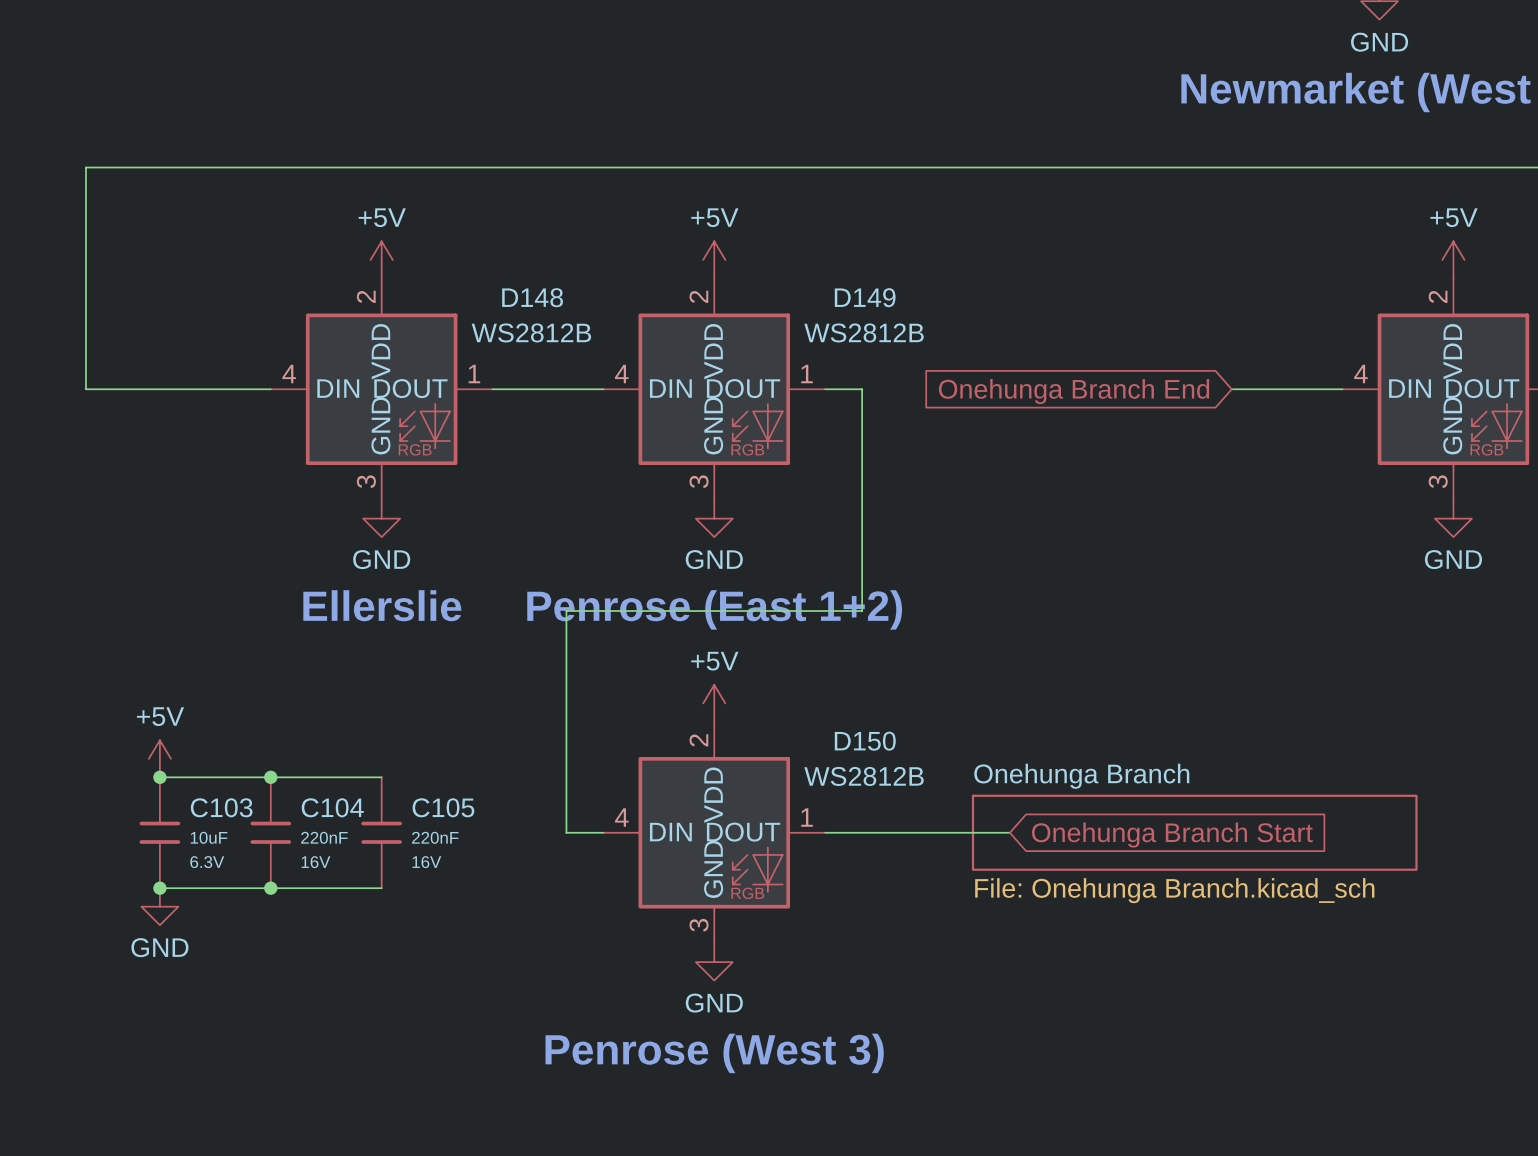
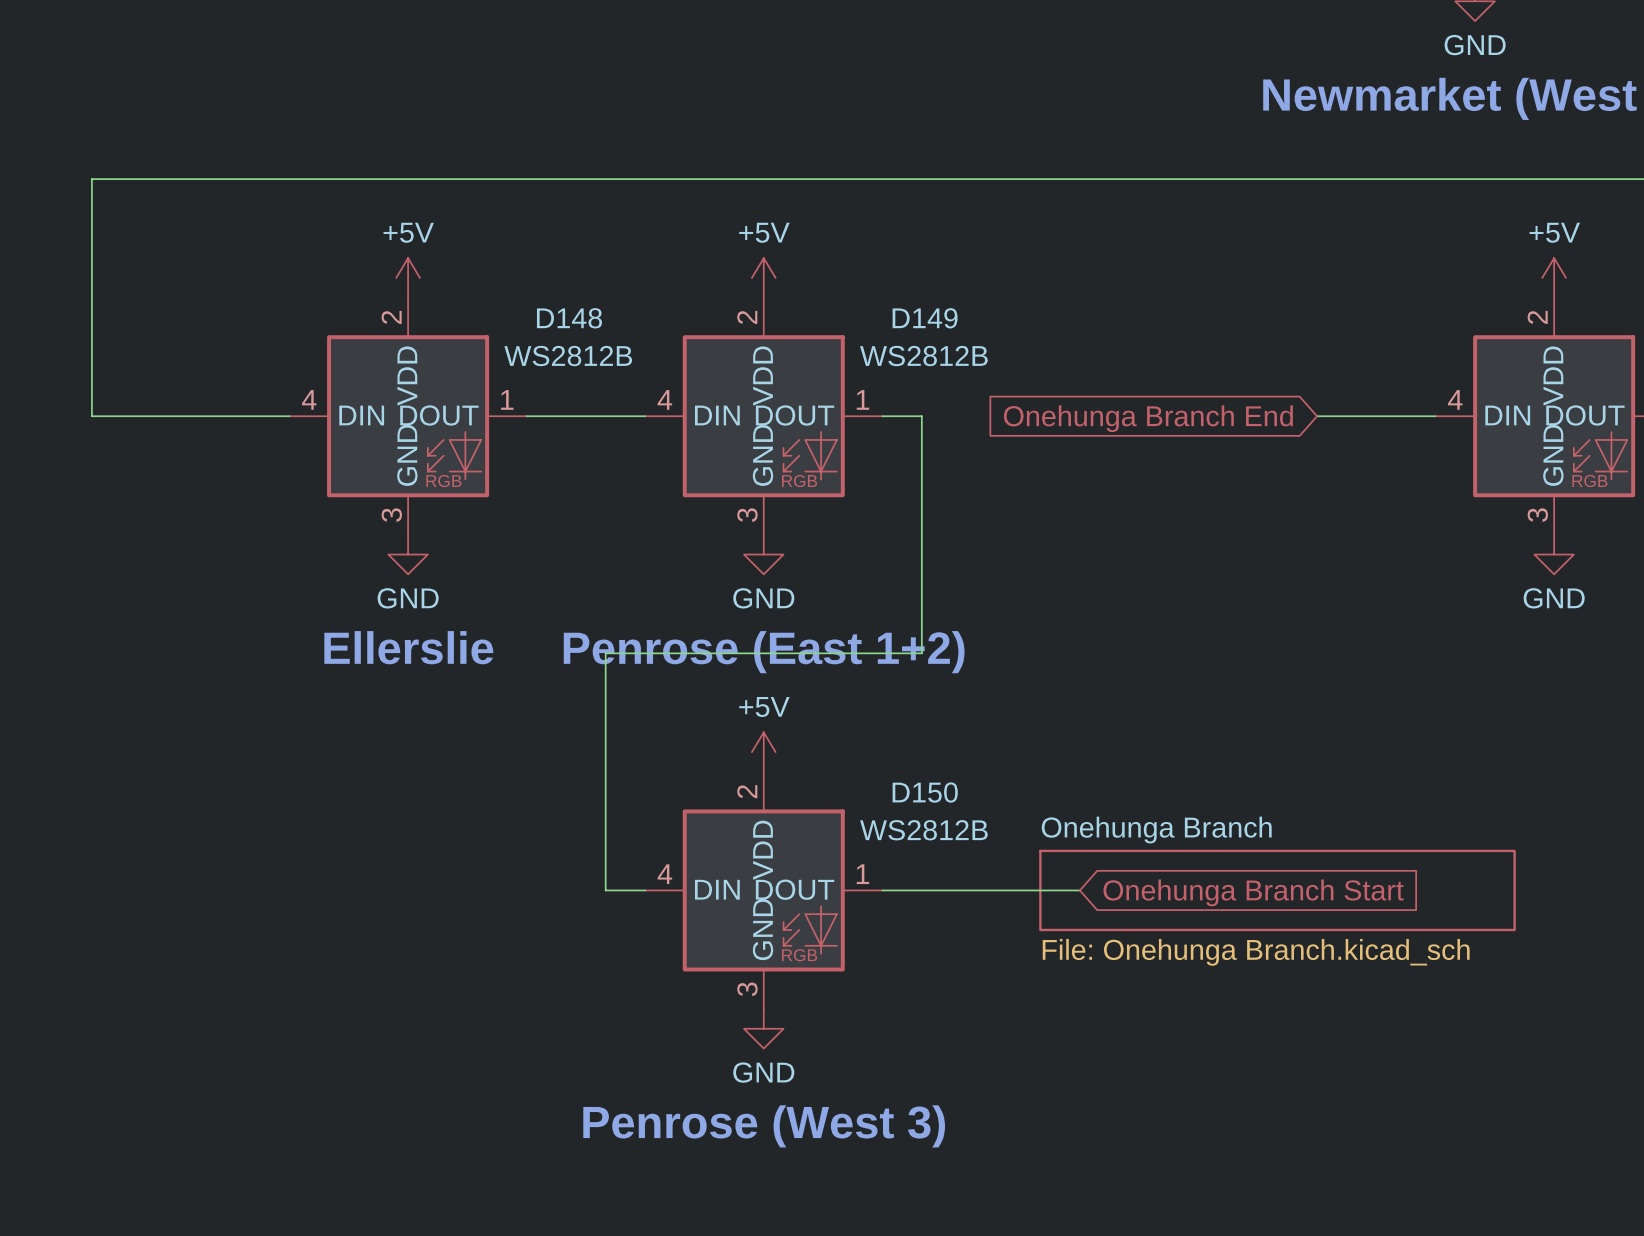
power symbol: +5V (159, 758) -> none
wire: (159, 777) (381, 777) -> none
junction: (159, 777) -> none
junction: (270, 777) -> none
C103: 10uF (159, 832) -> none
C104: 220nF (270, 832) -> none
C105: 220nF (381, 832) -> none
wire: (159, 888) (381, 888) -> none
junction: (159, 888) -> none
junction: (270, 888) -> none
power symbol: GND (159, 906) -> none

